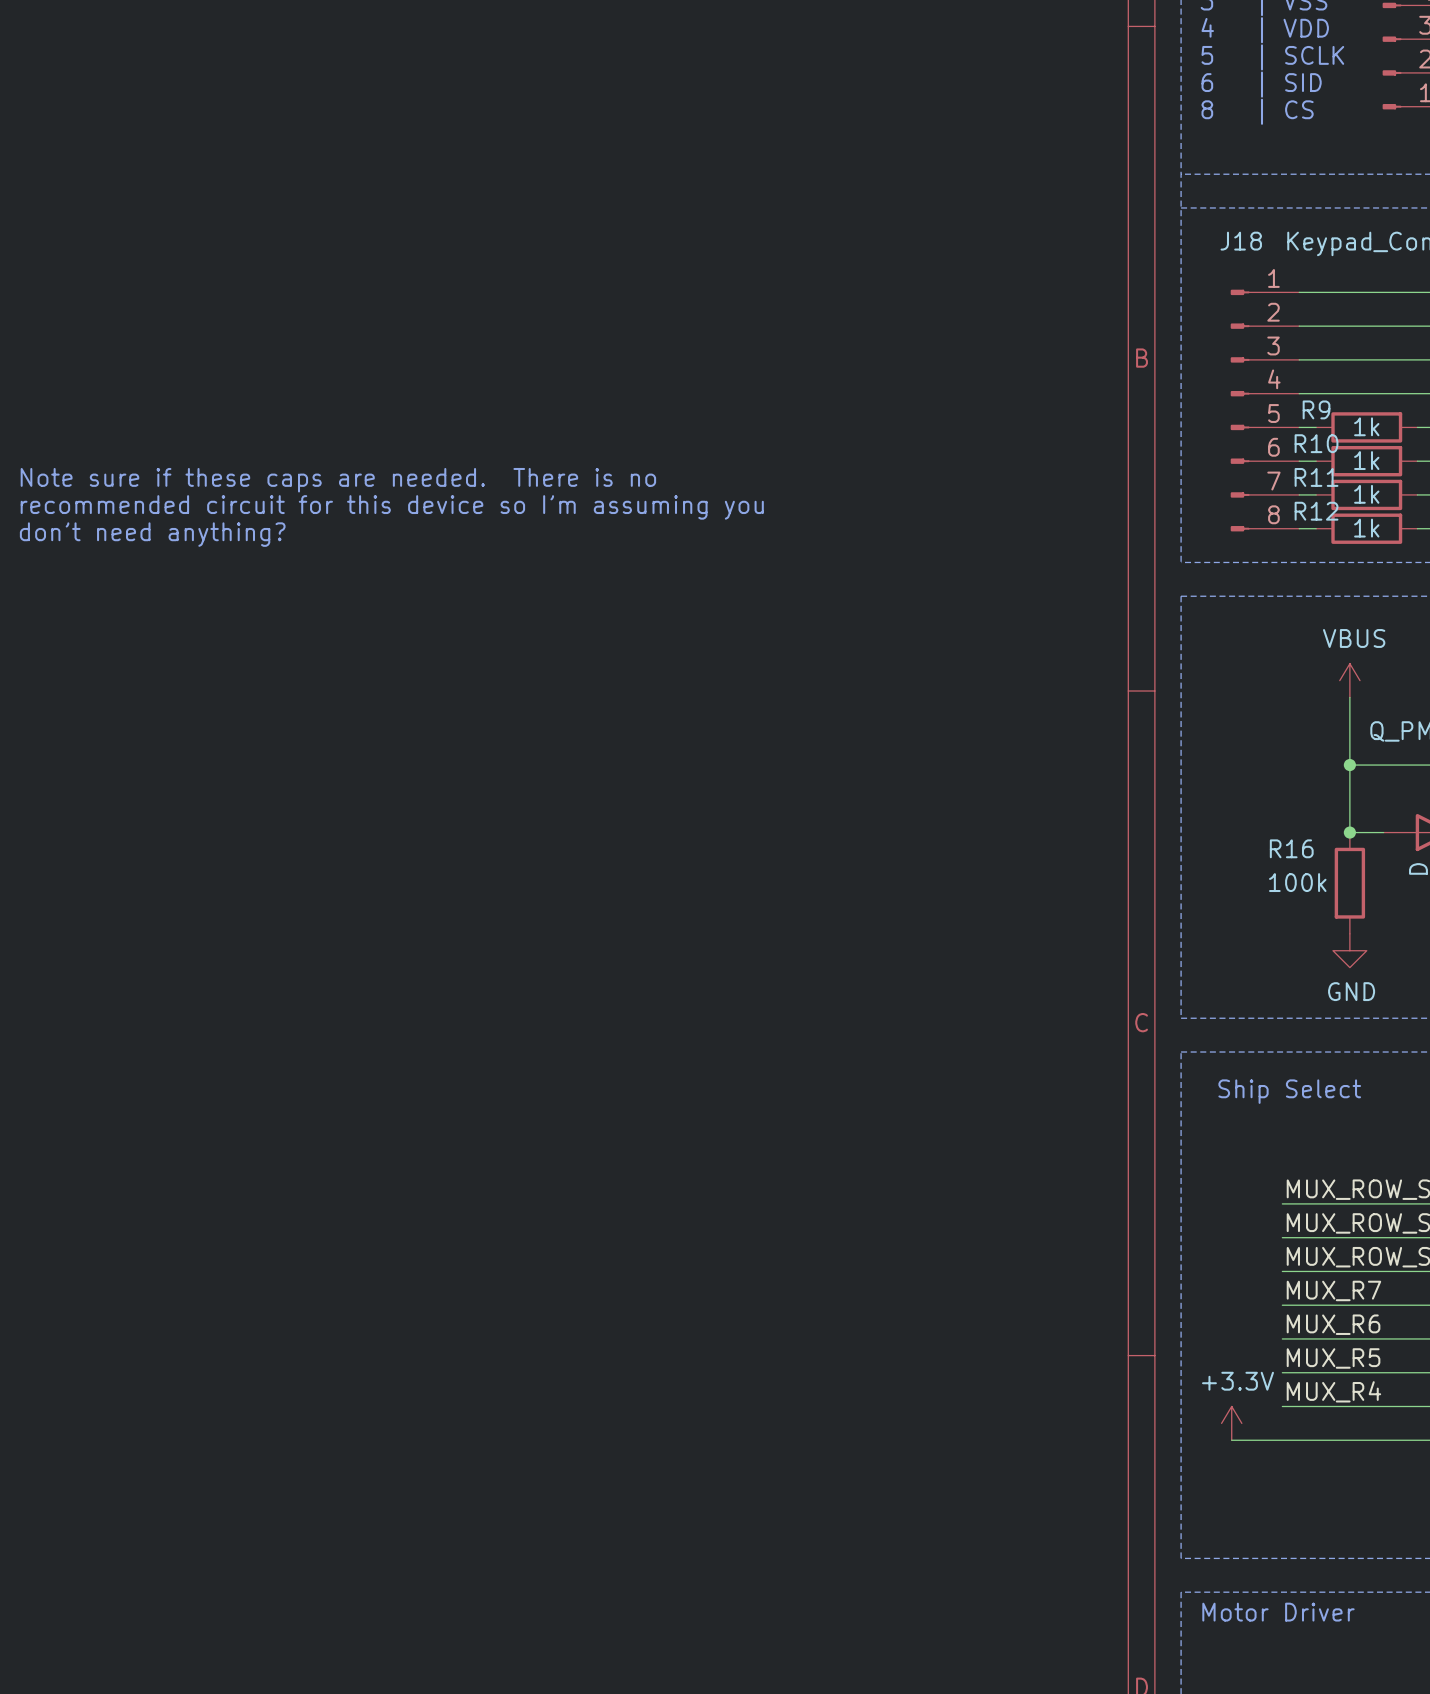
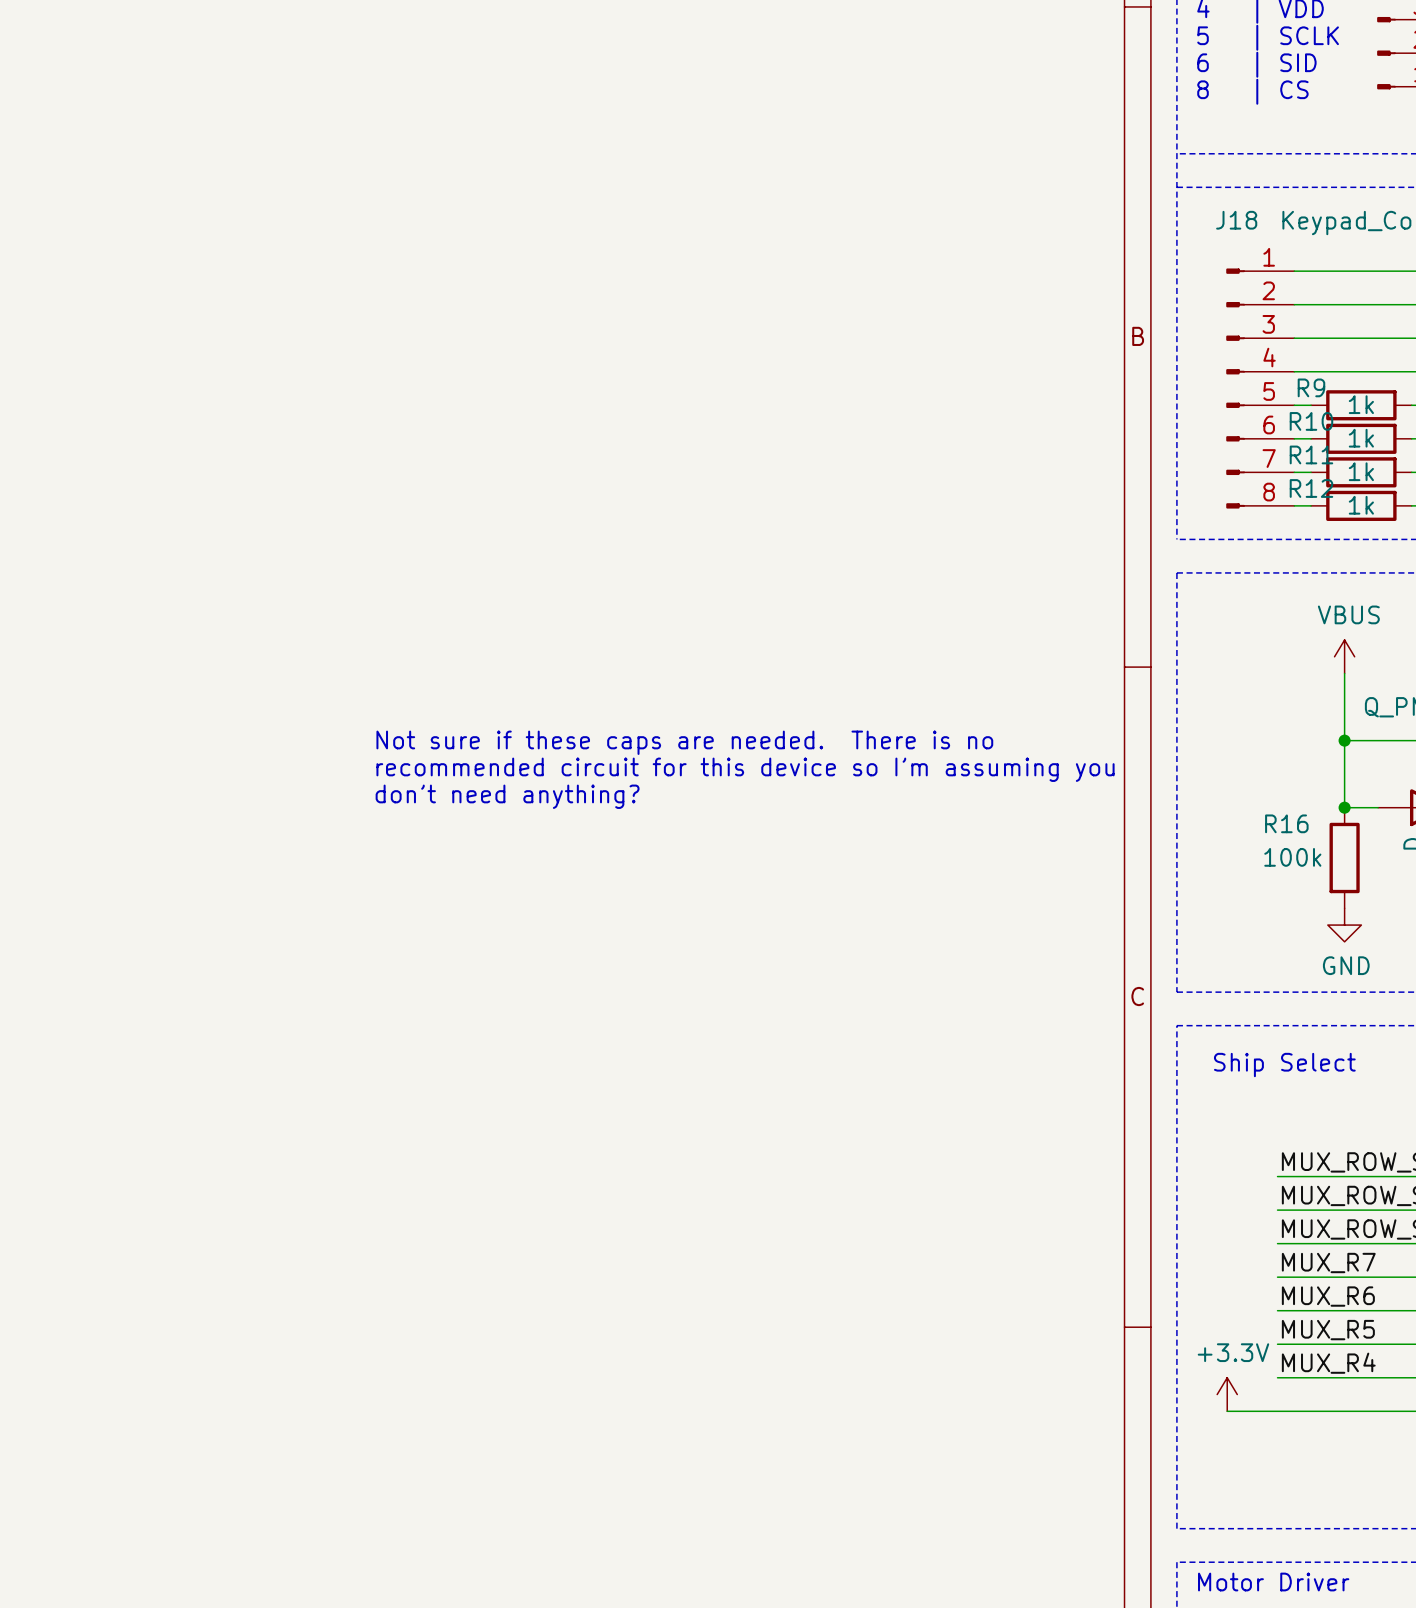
text: Note sure if these caps are needed. There is no (338, 480) -> none
text: recommended circuit for this device so I’m assuming you (392, 507) -> none
text: don’t need anything? (152, 534) -> none
text: none -> Not sure if these caps are needed. There is no (684, 742)
text: none -> recommended circuit for this device so I’m assuming you (745, 769)
text: none -> don’t need anything? (507, 796)

